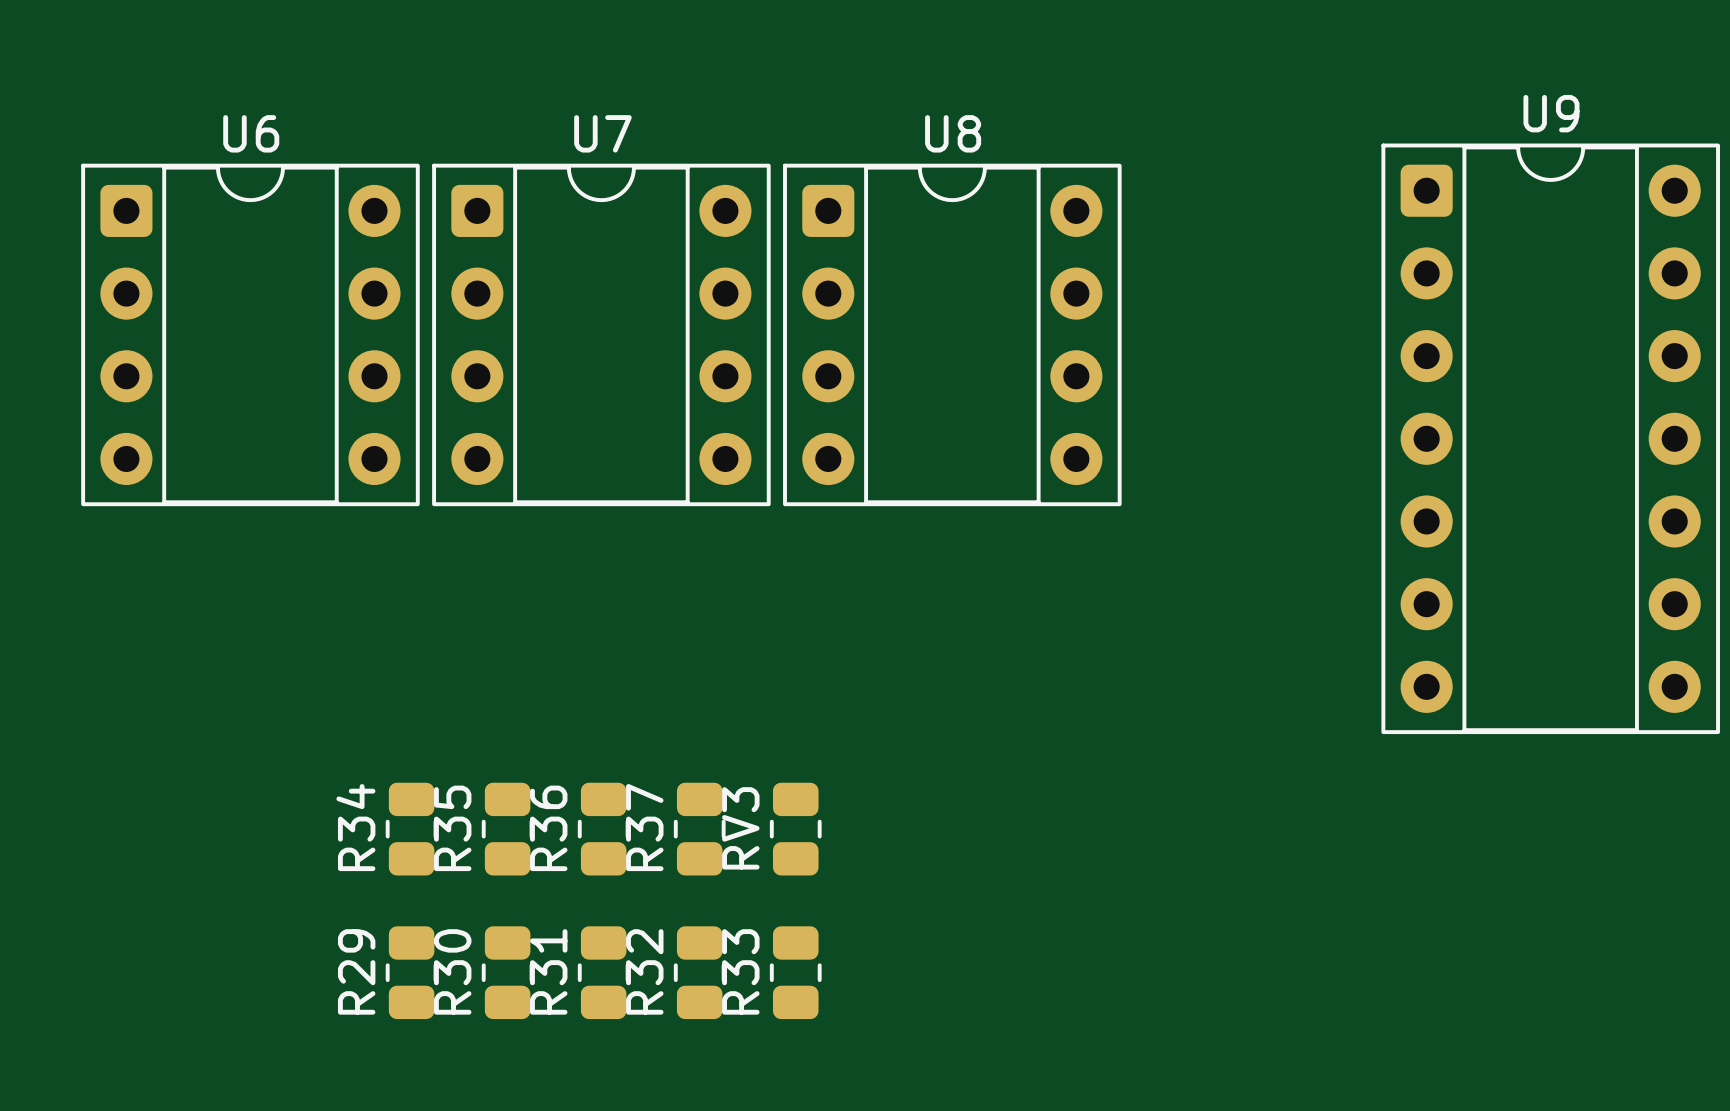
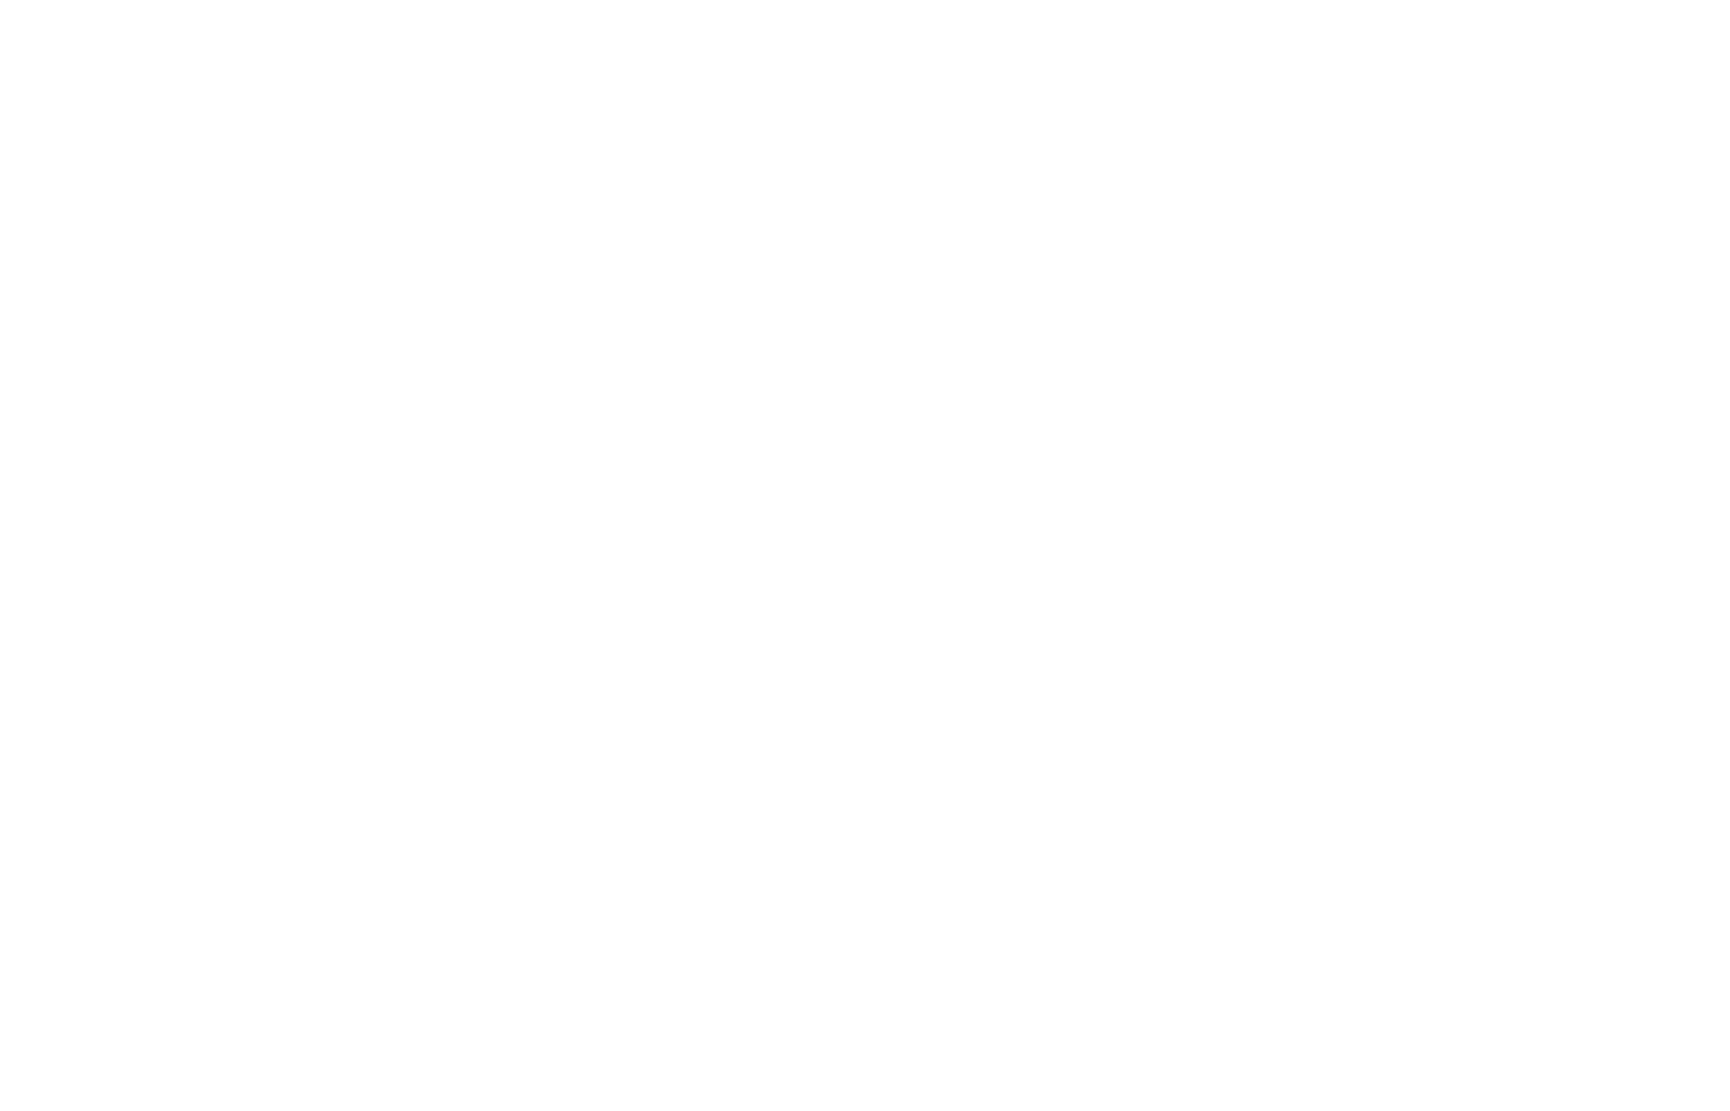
U6: (250, 334) -> none
U7: (601, 334) -> none
U8: (952, 334) -> none
U9: (1550, 438) -> none
R34: (411, 829) -> none
R35: (507, 829) -> none
R36: (603, 829) -> none
R37: (699, 829) -> none
RV3: (795, 829) -> none
R29: (411, 972) -> none
R30: (507, 972) -> none
R31: (603, 972) -> none
R32: (699, 972) -> none
R33: (795, 972) -> none

